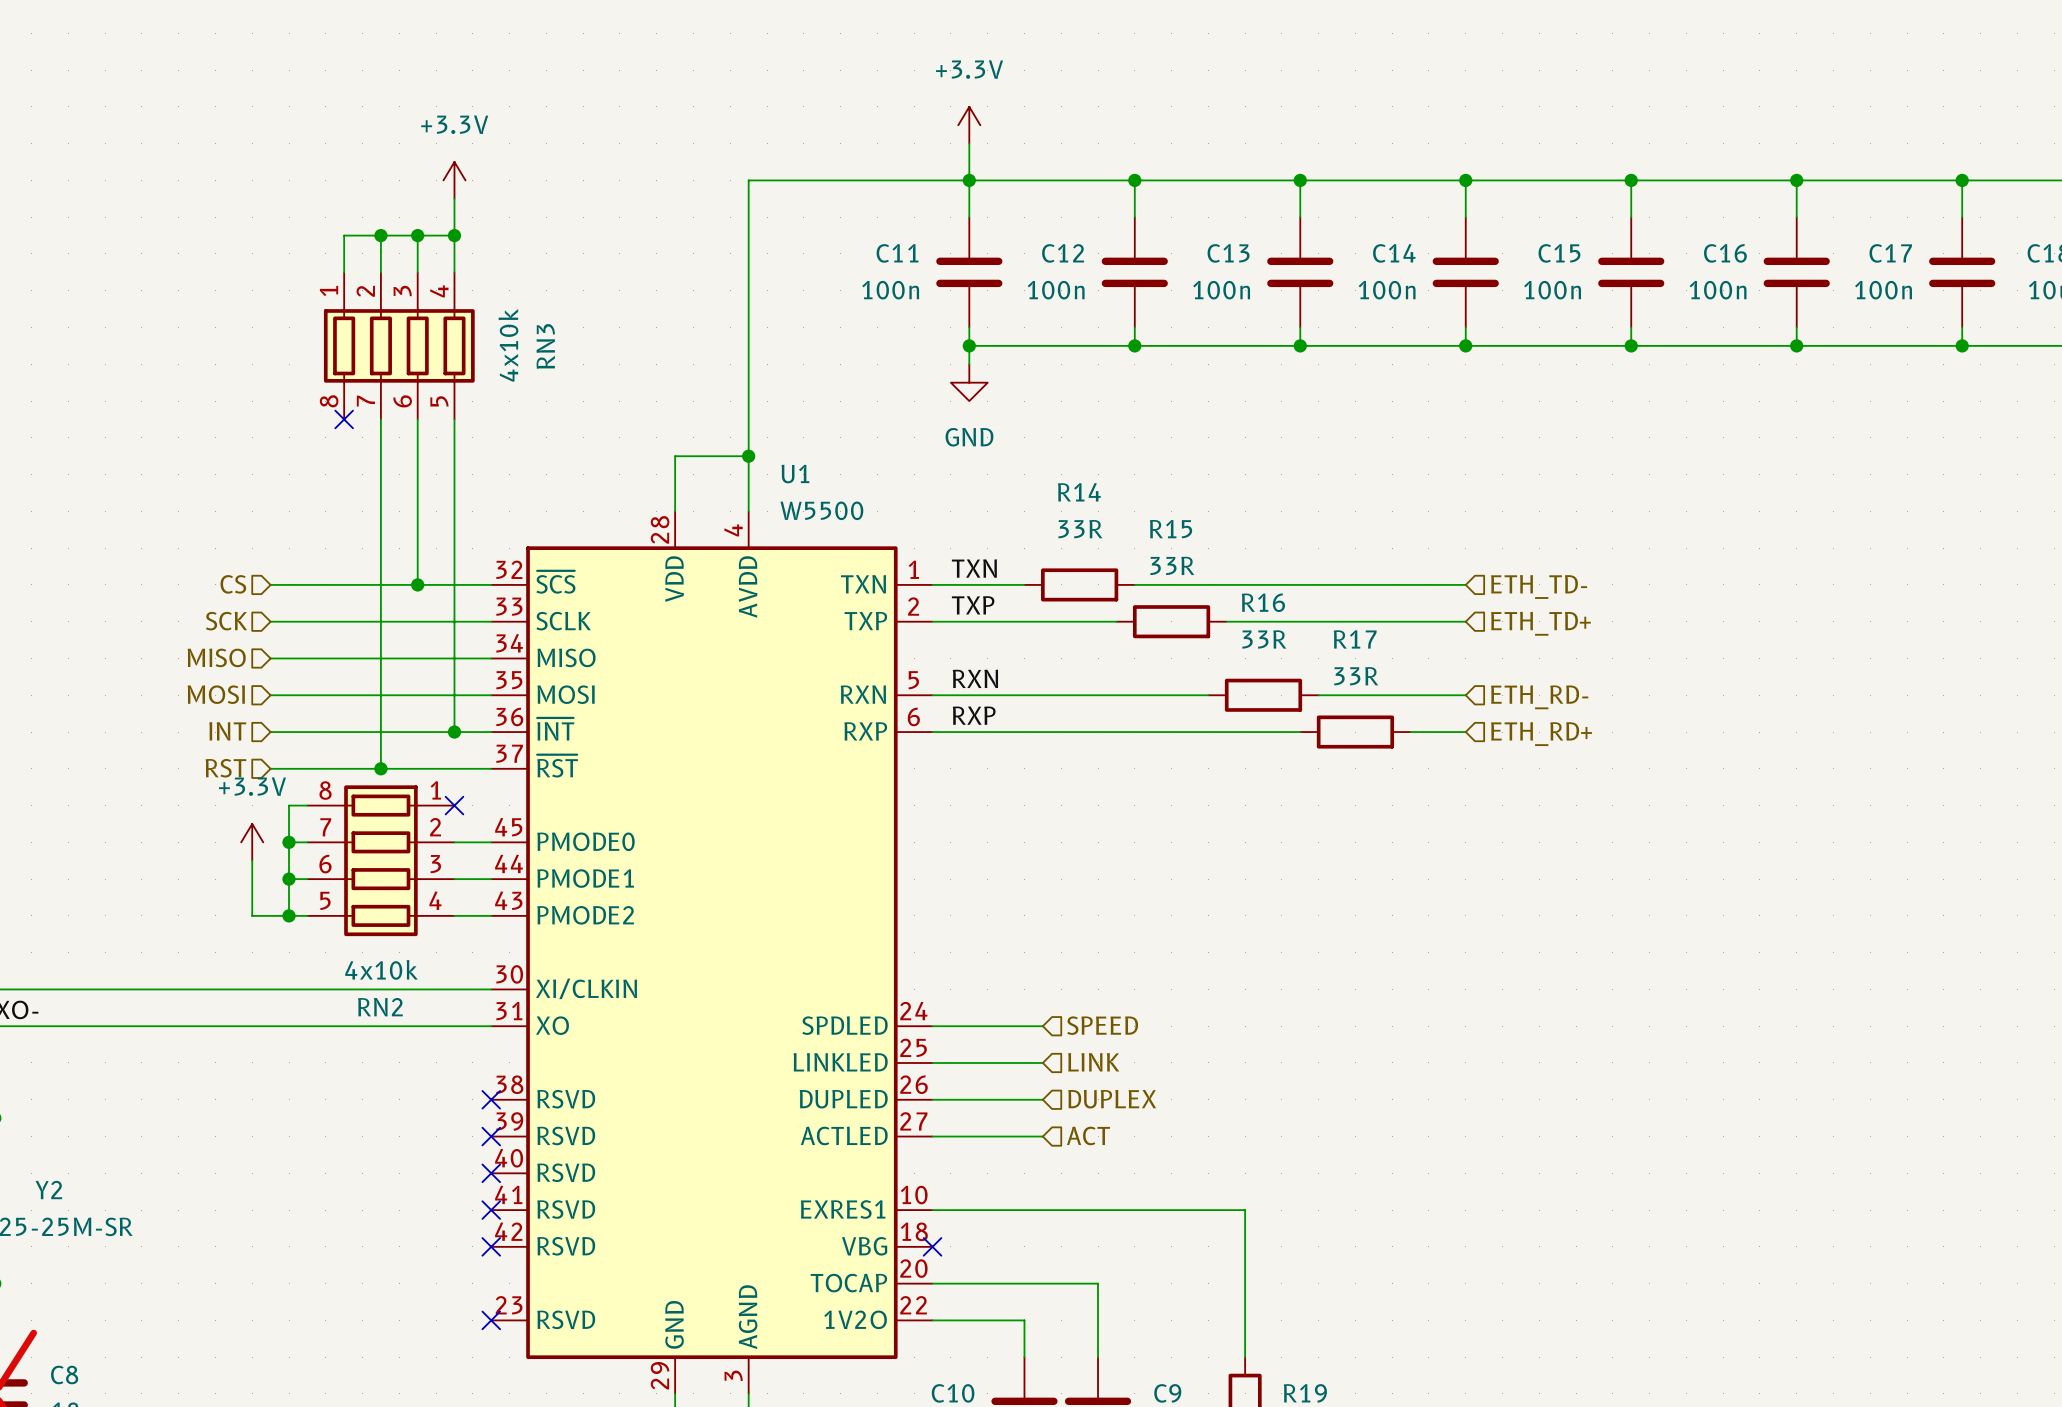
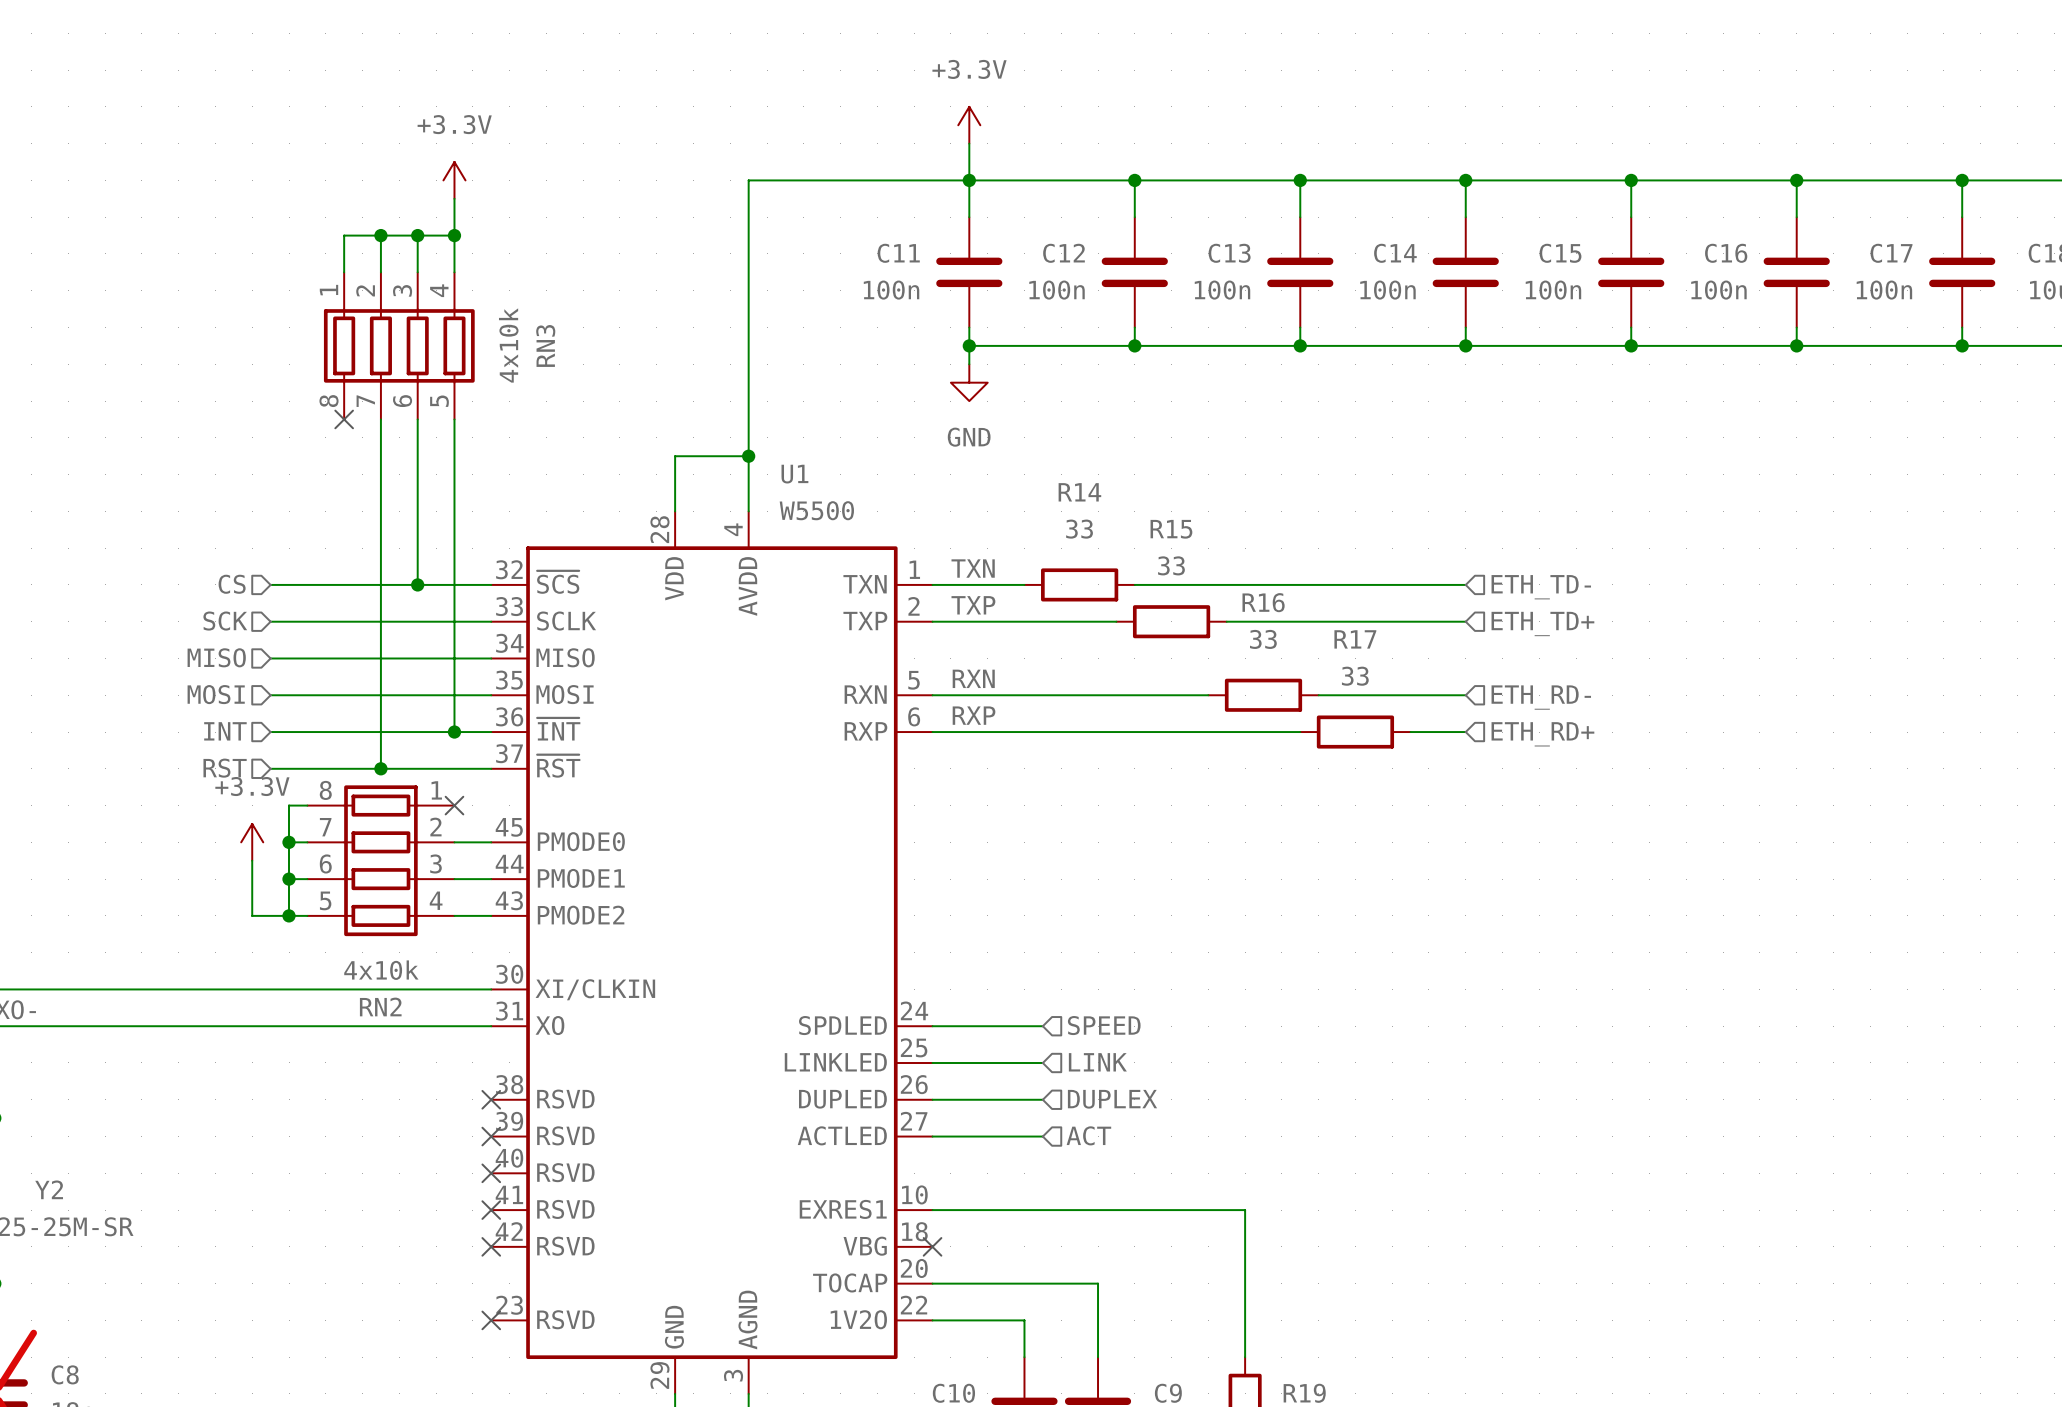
R14 value: 33R (1080, 529) -> 33 (1079, 529)
R15 value: 33R (1172, 565) -> 33 (1171, 565)
R16 value: 33R (1264, 639) -> 33 (1263, 639)
R17 value: 33R (1356, 676) -> 33 (1355, 676)

